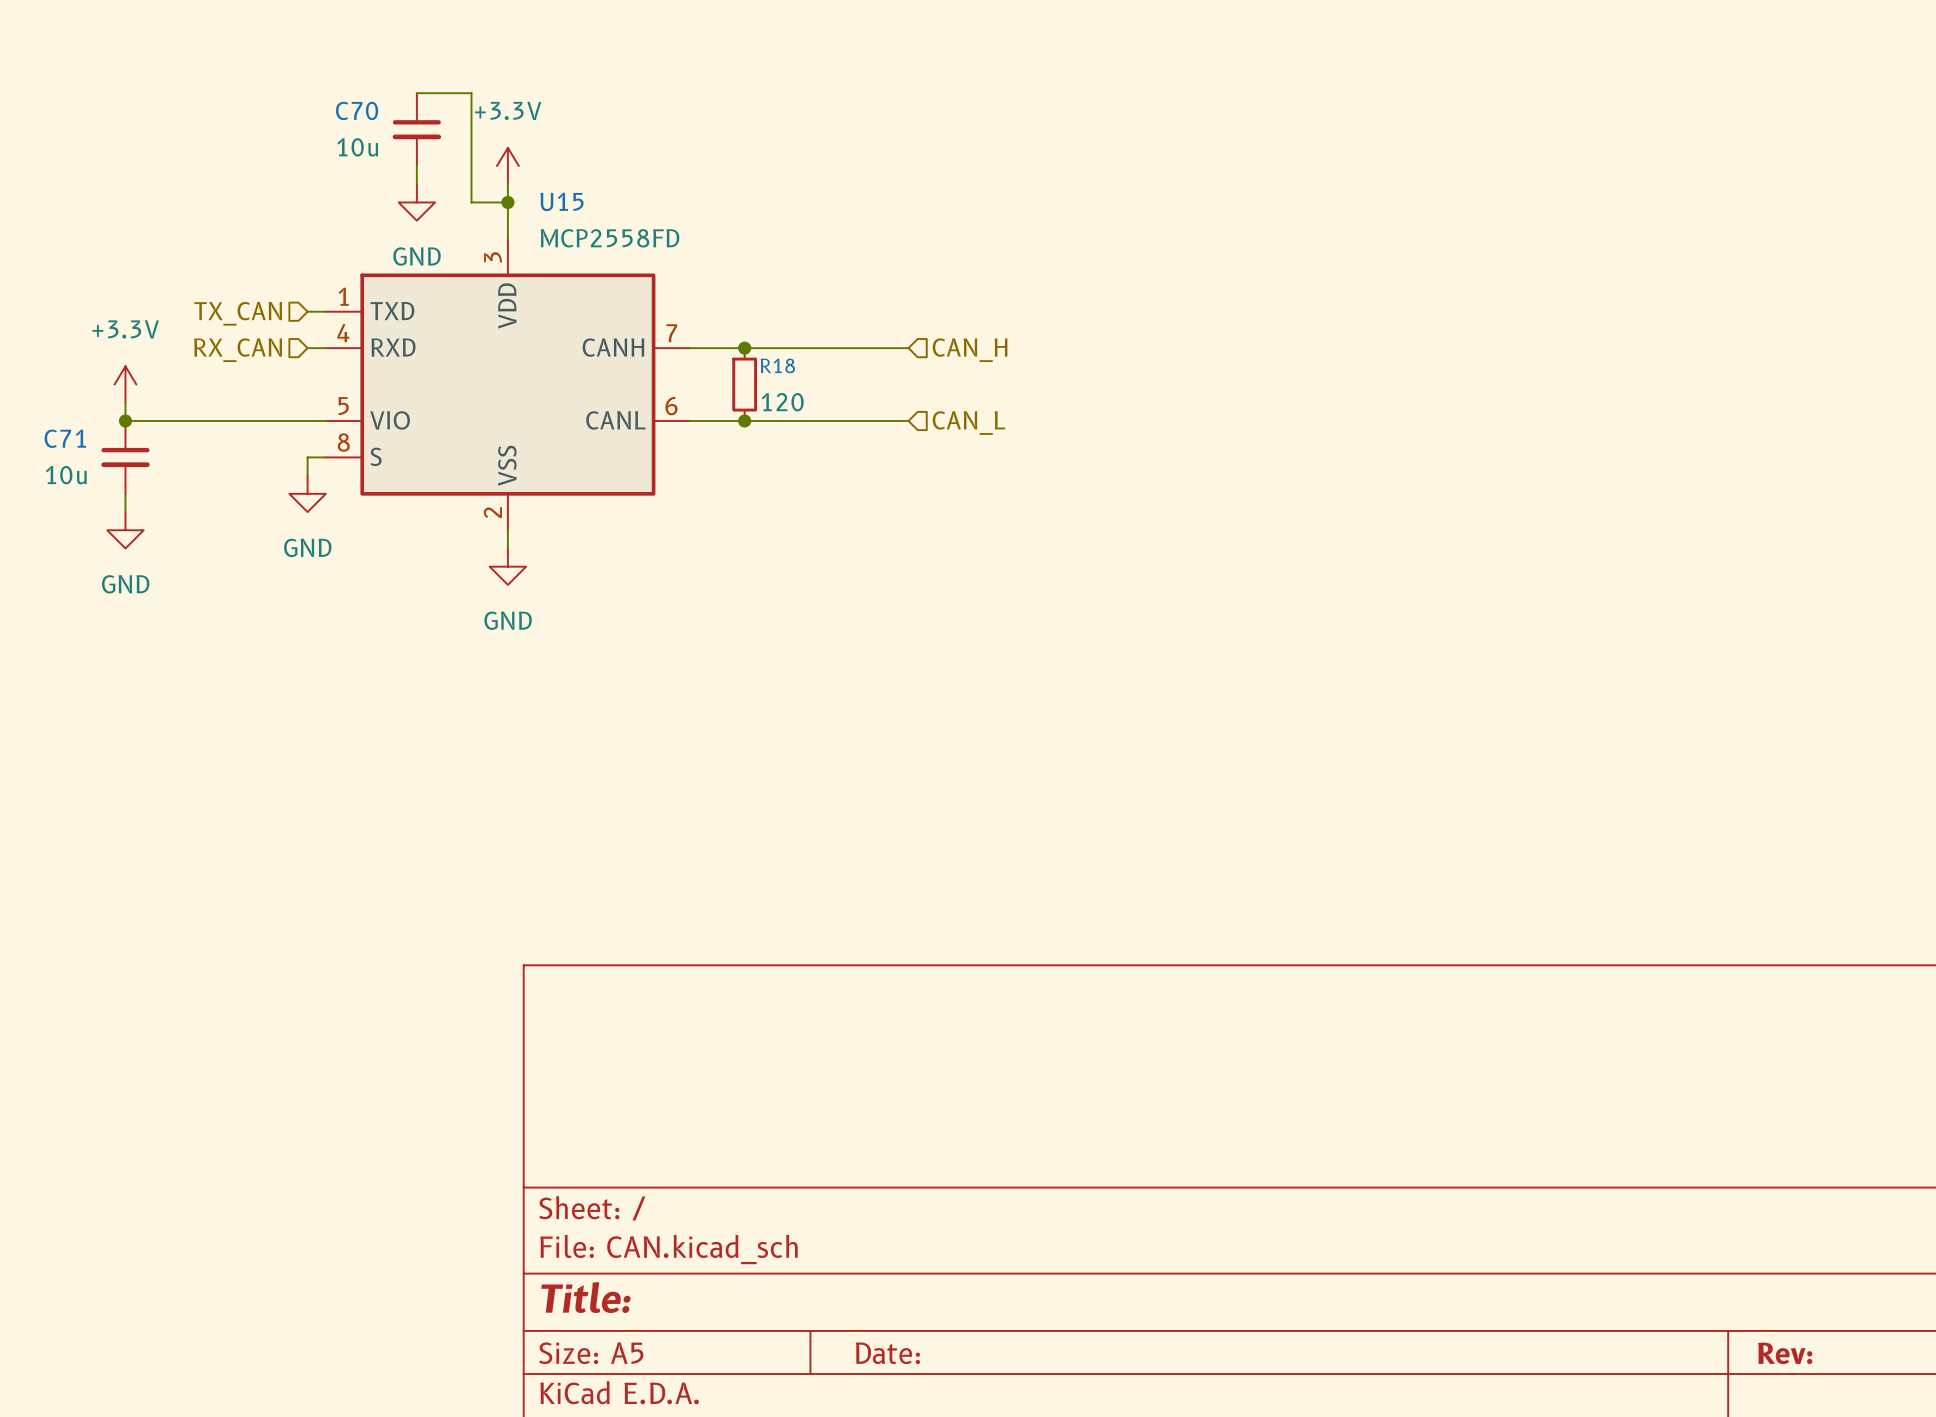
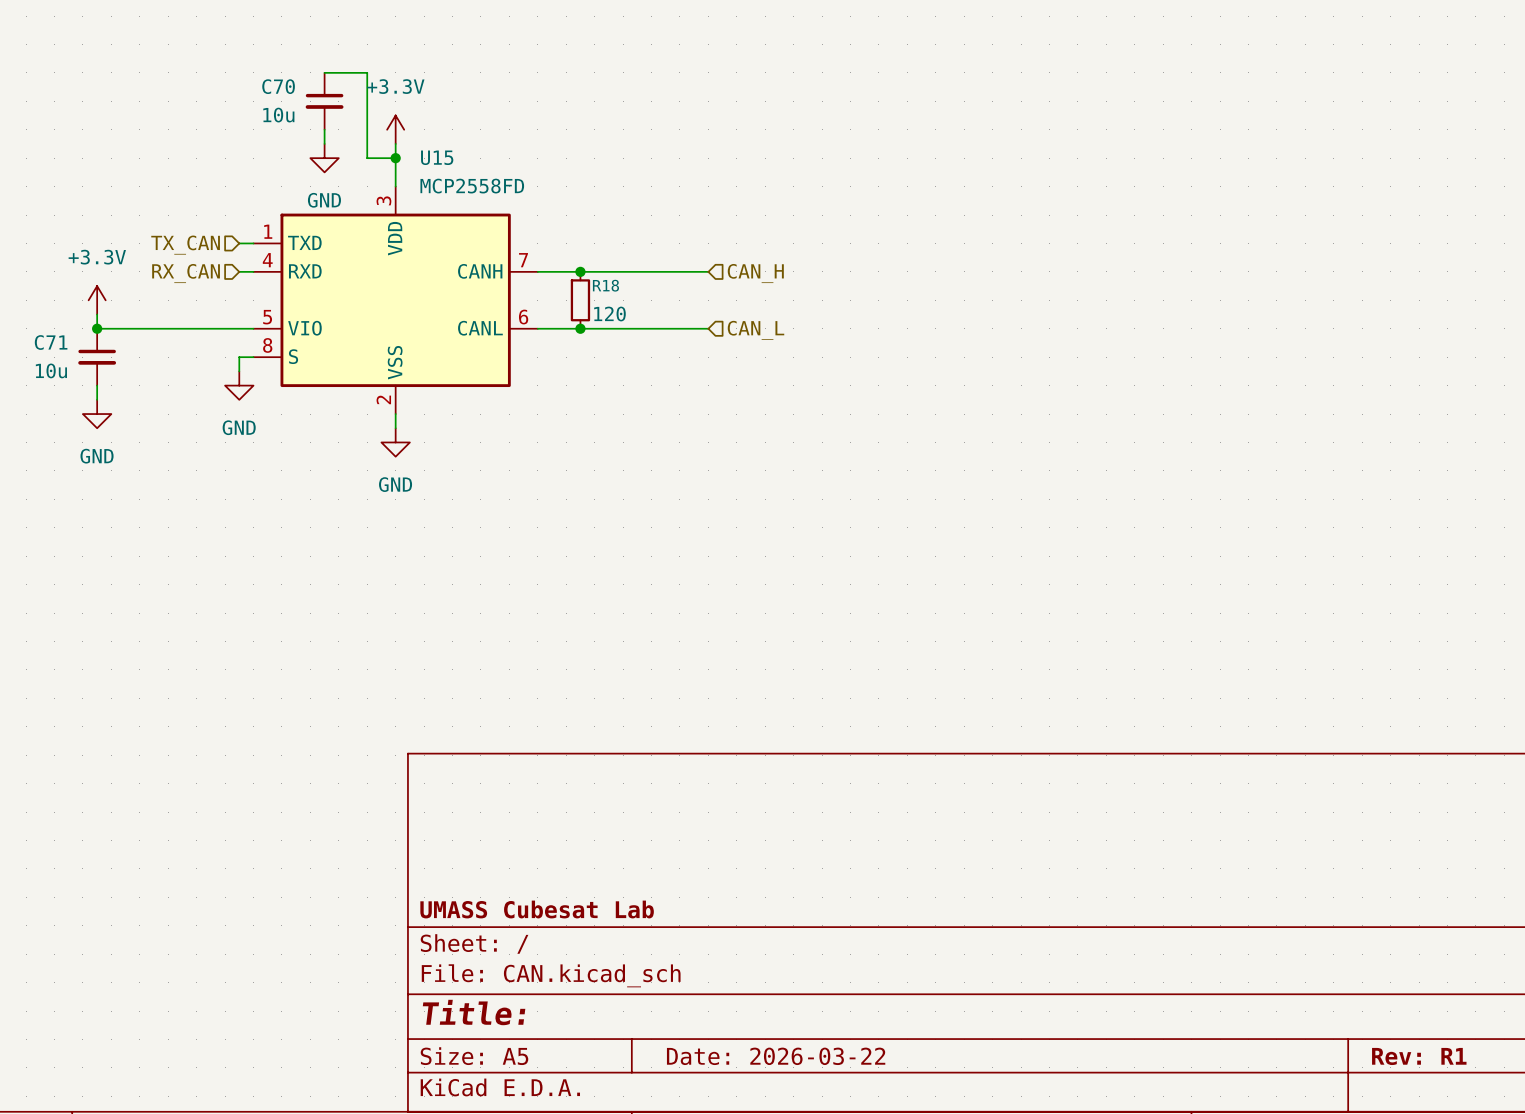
title block: none -> UMASS Cubesat Lab (537, 909)
title block: Date: (887, 1353) -> Date: 2026-03-22 (776, 1056)
title block: Rev: (1785, 1353) -> Rev: R1 (1419, 1056)

